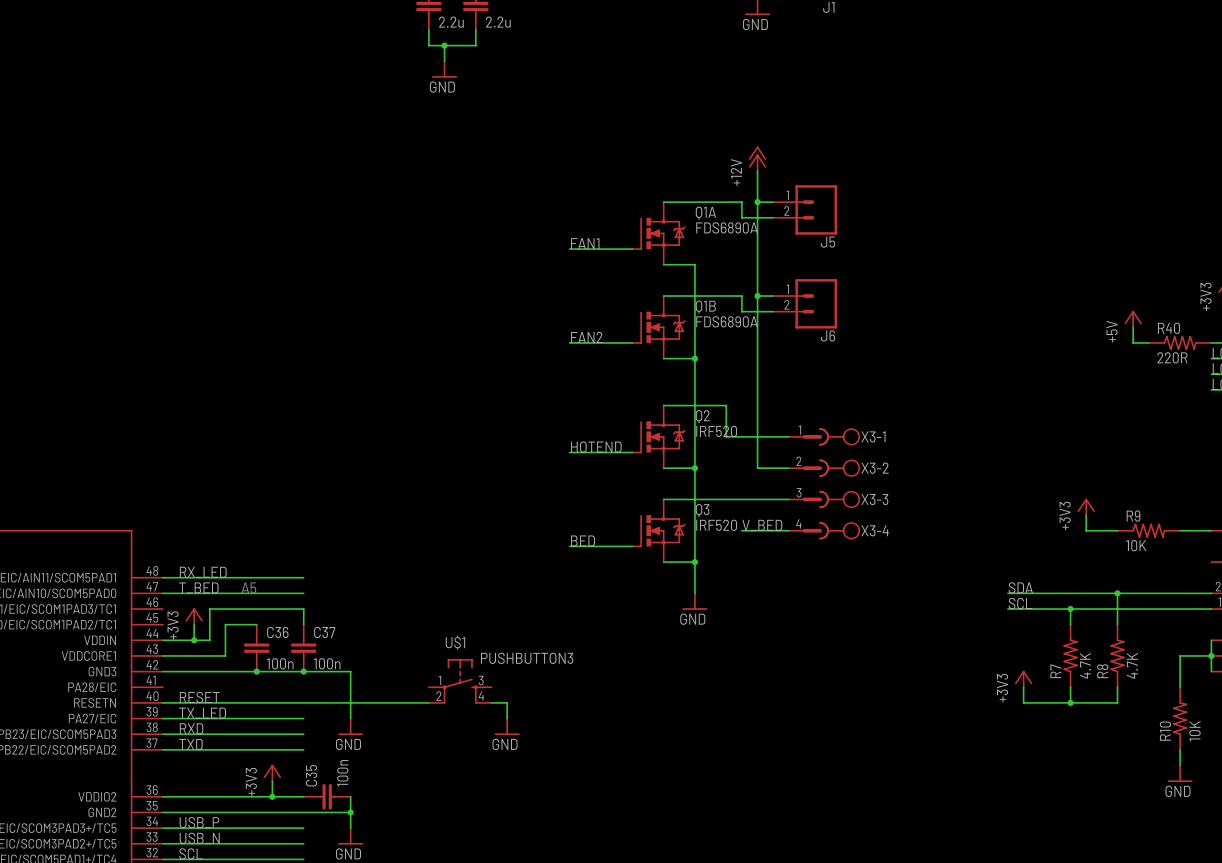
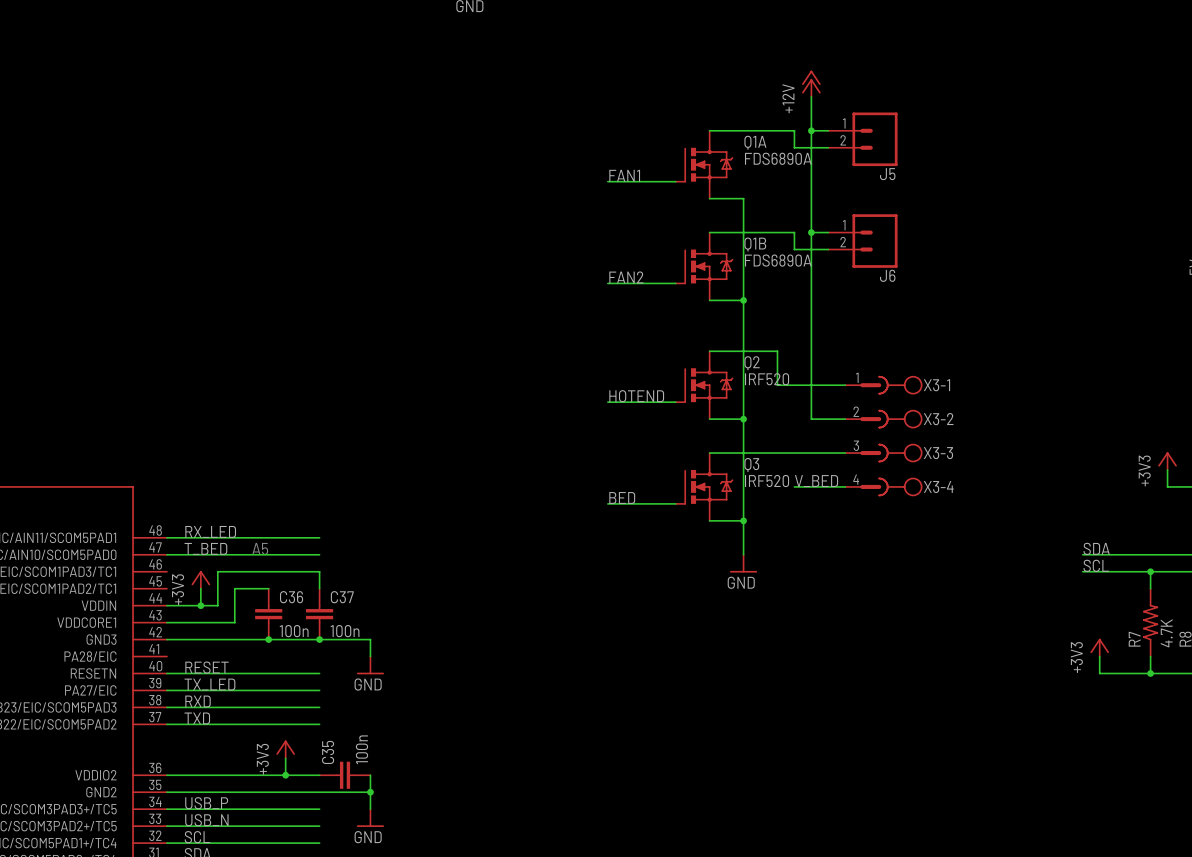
U$1: PUSHBUTTON3 (460, 681) -> none
wire: (303, 702) (428, 702) -> none
wire: (491, 702) (507, 702) (507, 718) -> none
power symbol position: GND (350, 726) -> GND (370, 665)
power symbol: GND (507, 726) -> none

